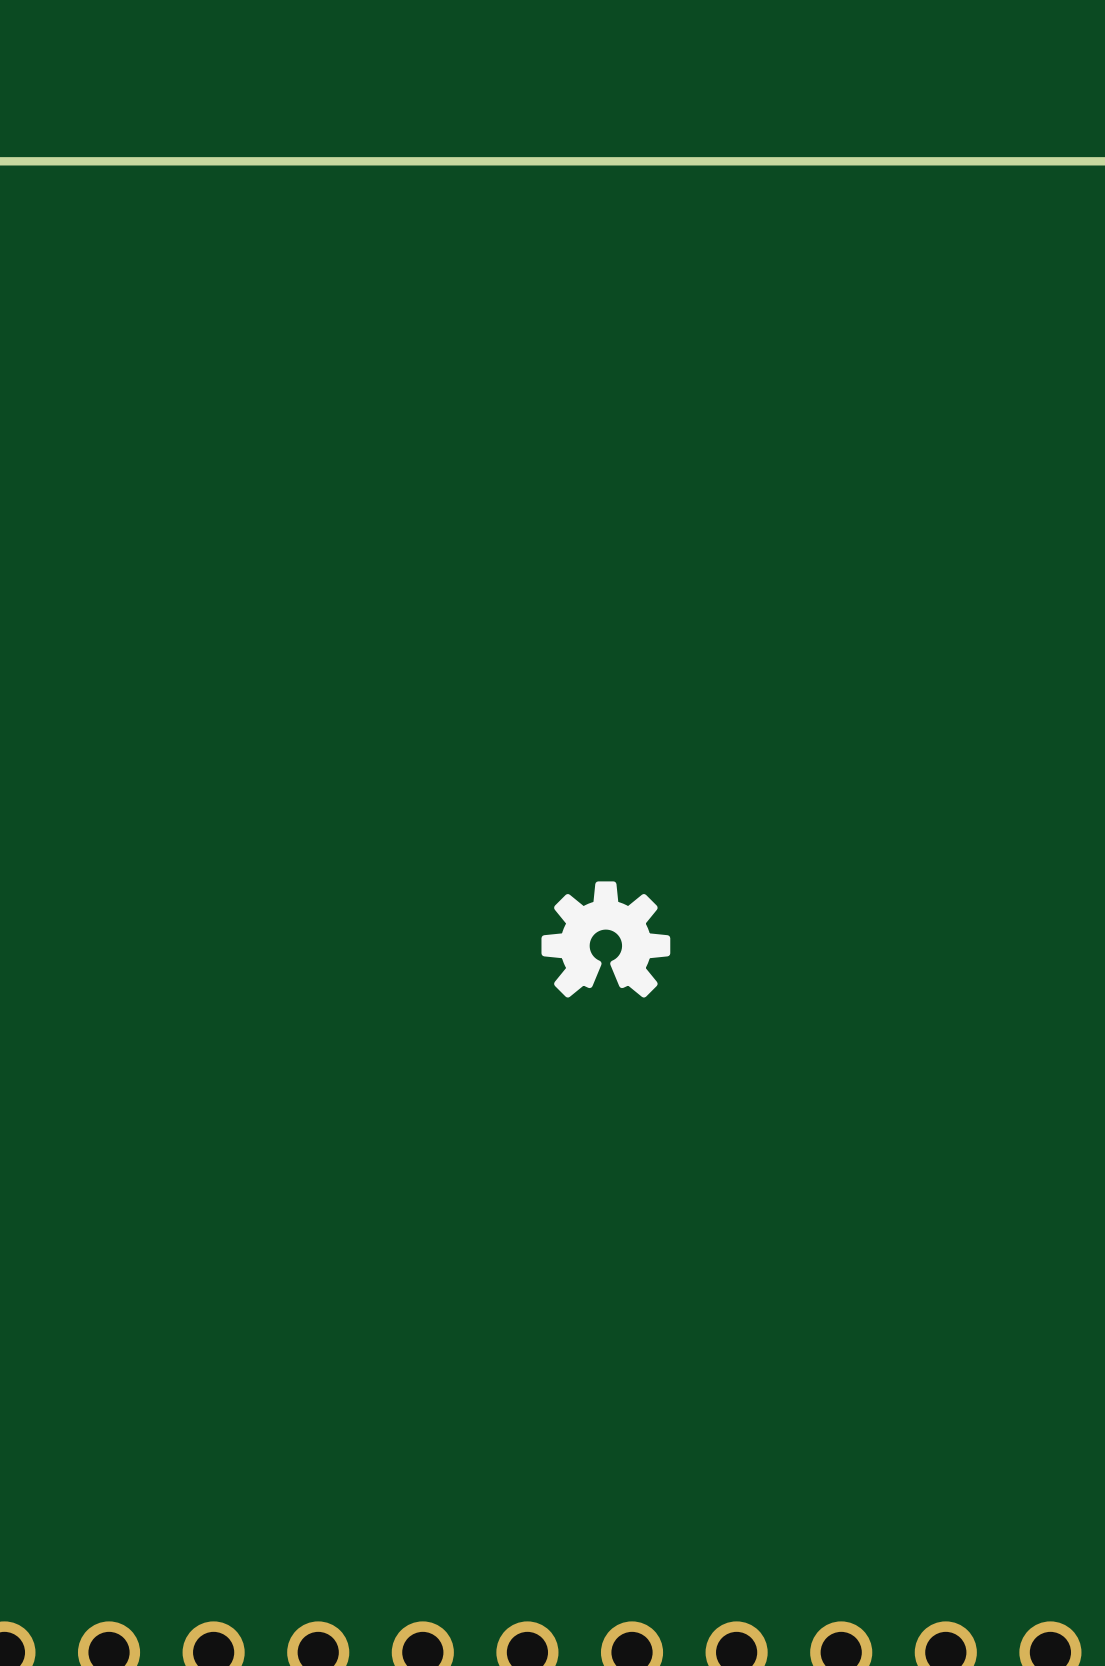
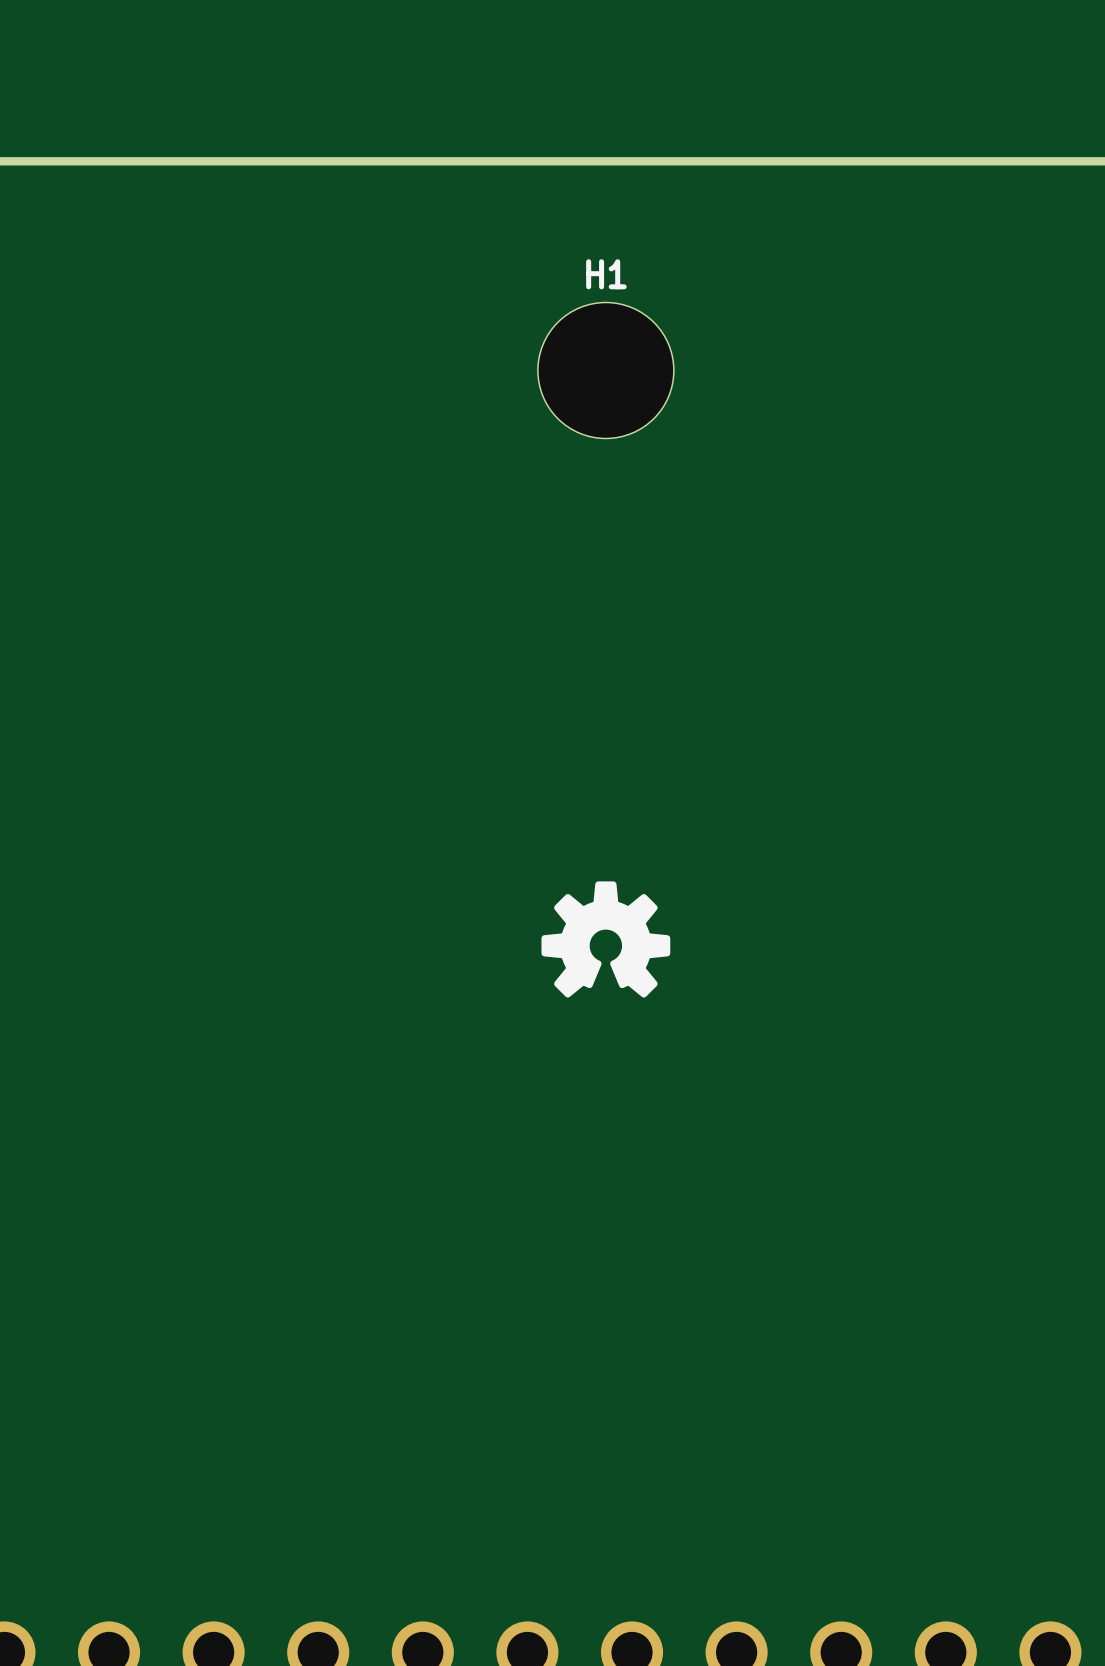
H1: none -> (605, 370)

